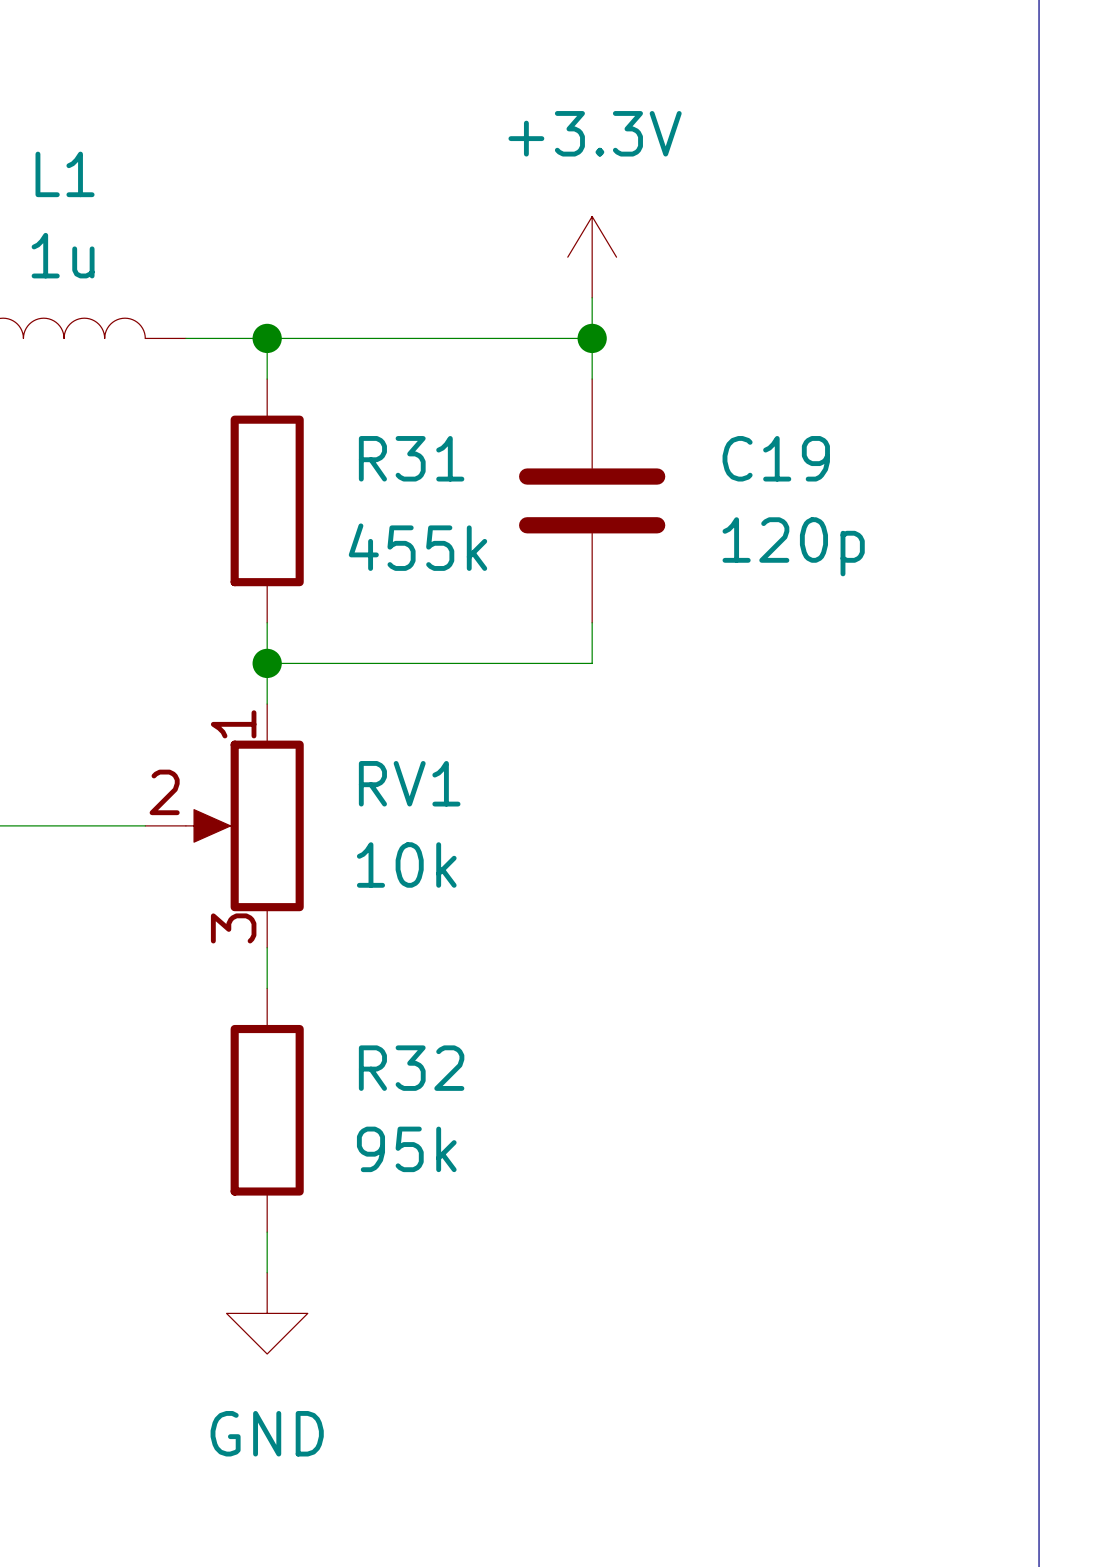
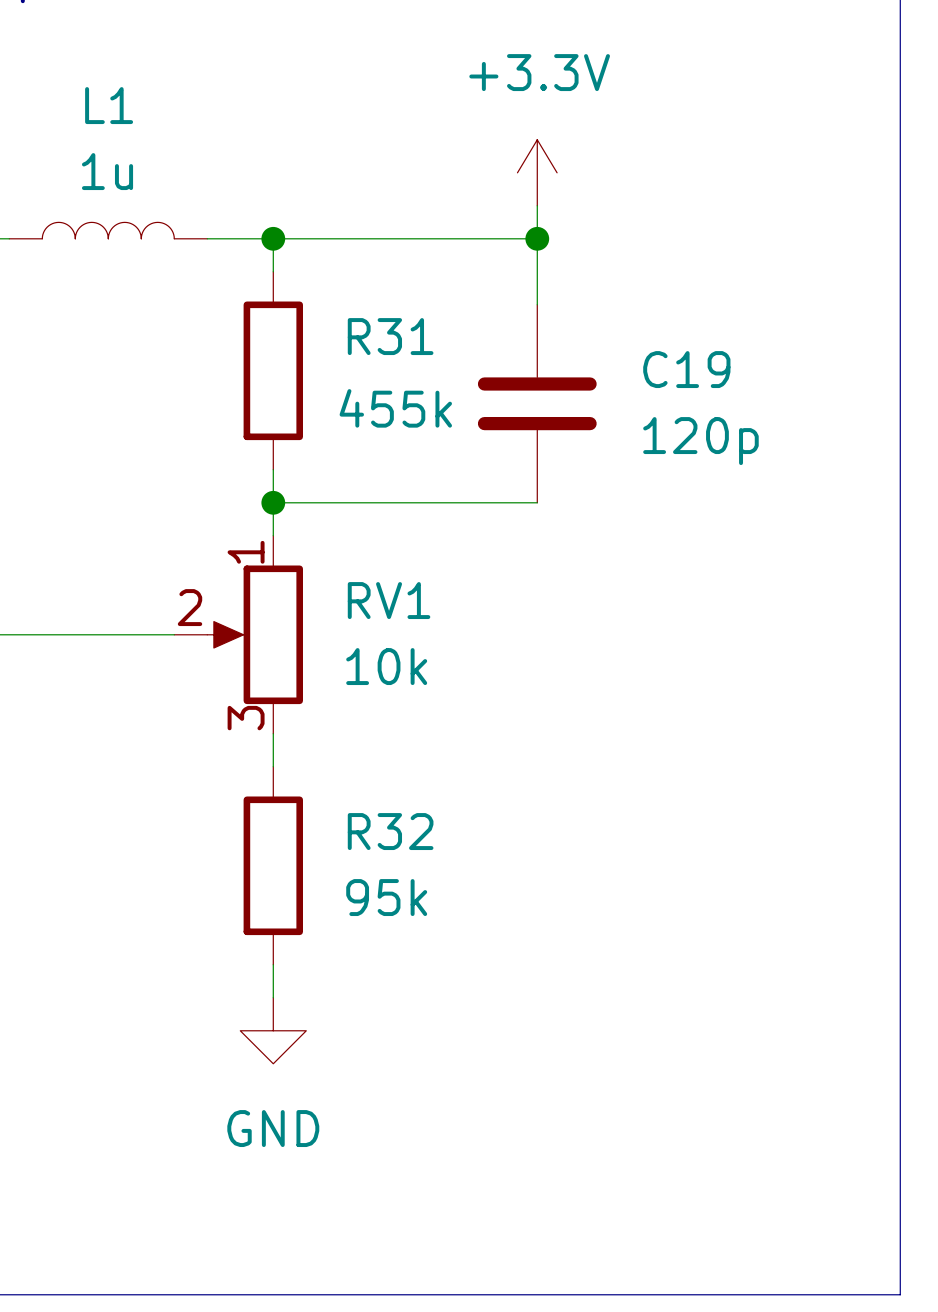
C19 position: (592, 500) -> (537, 403)

